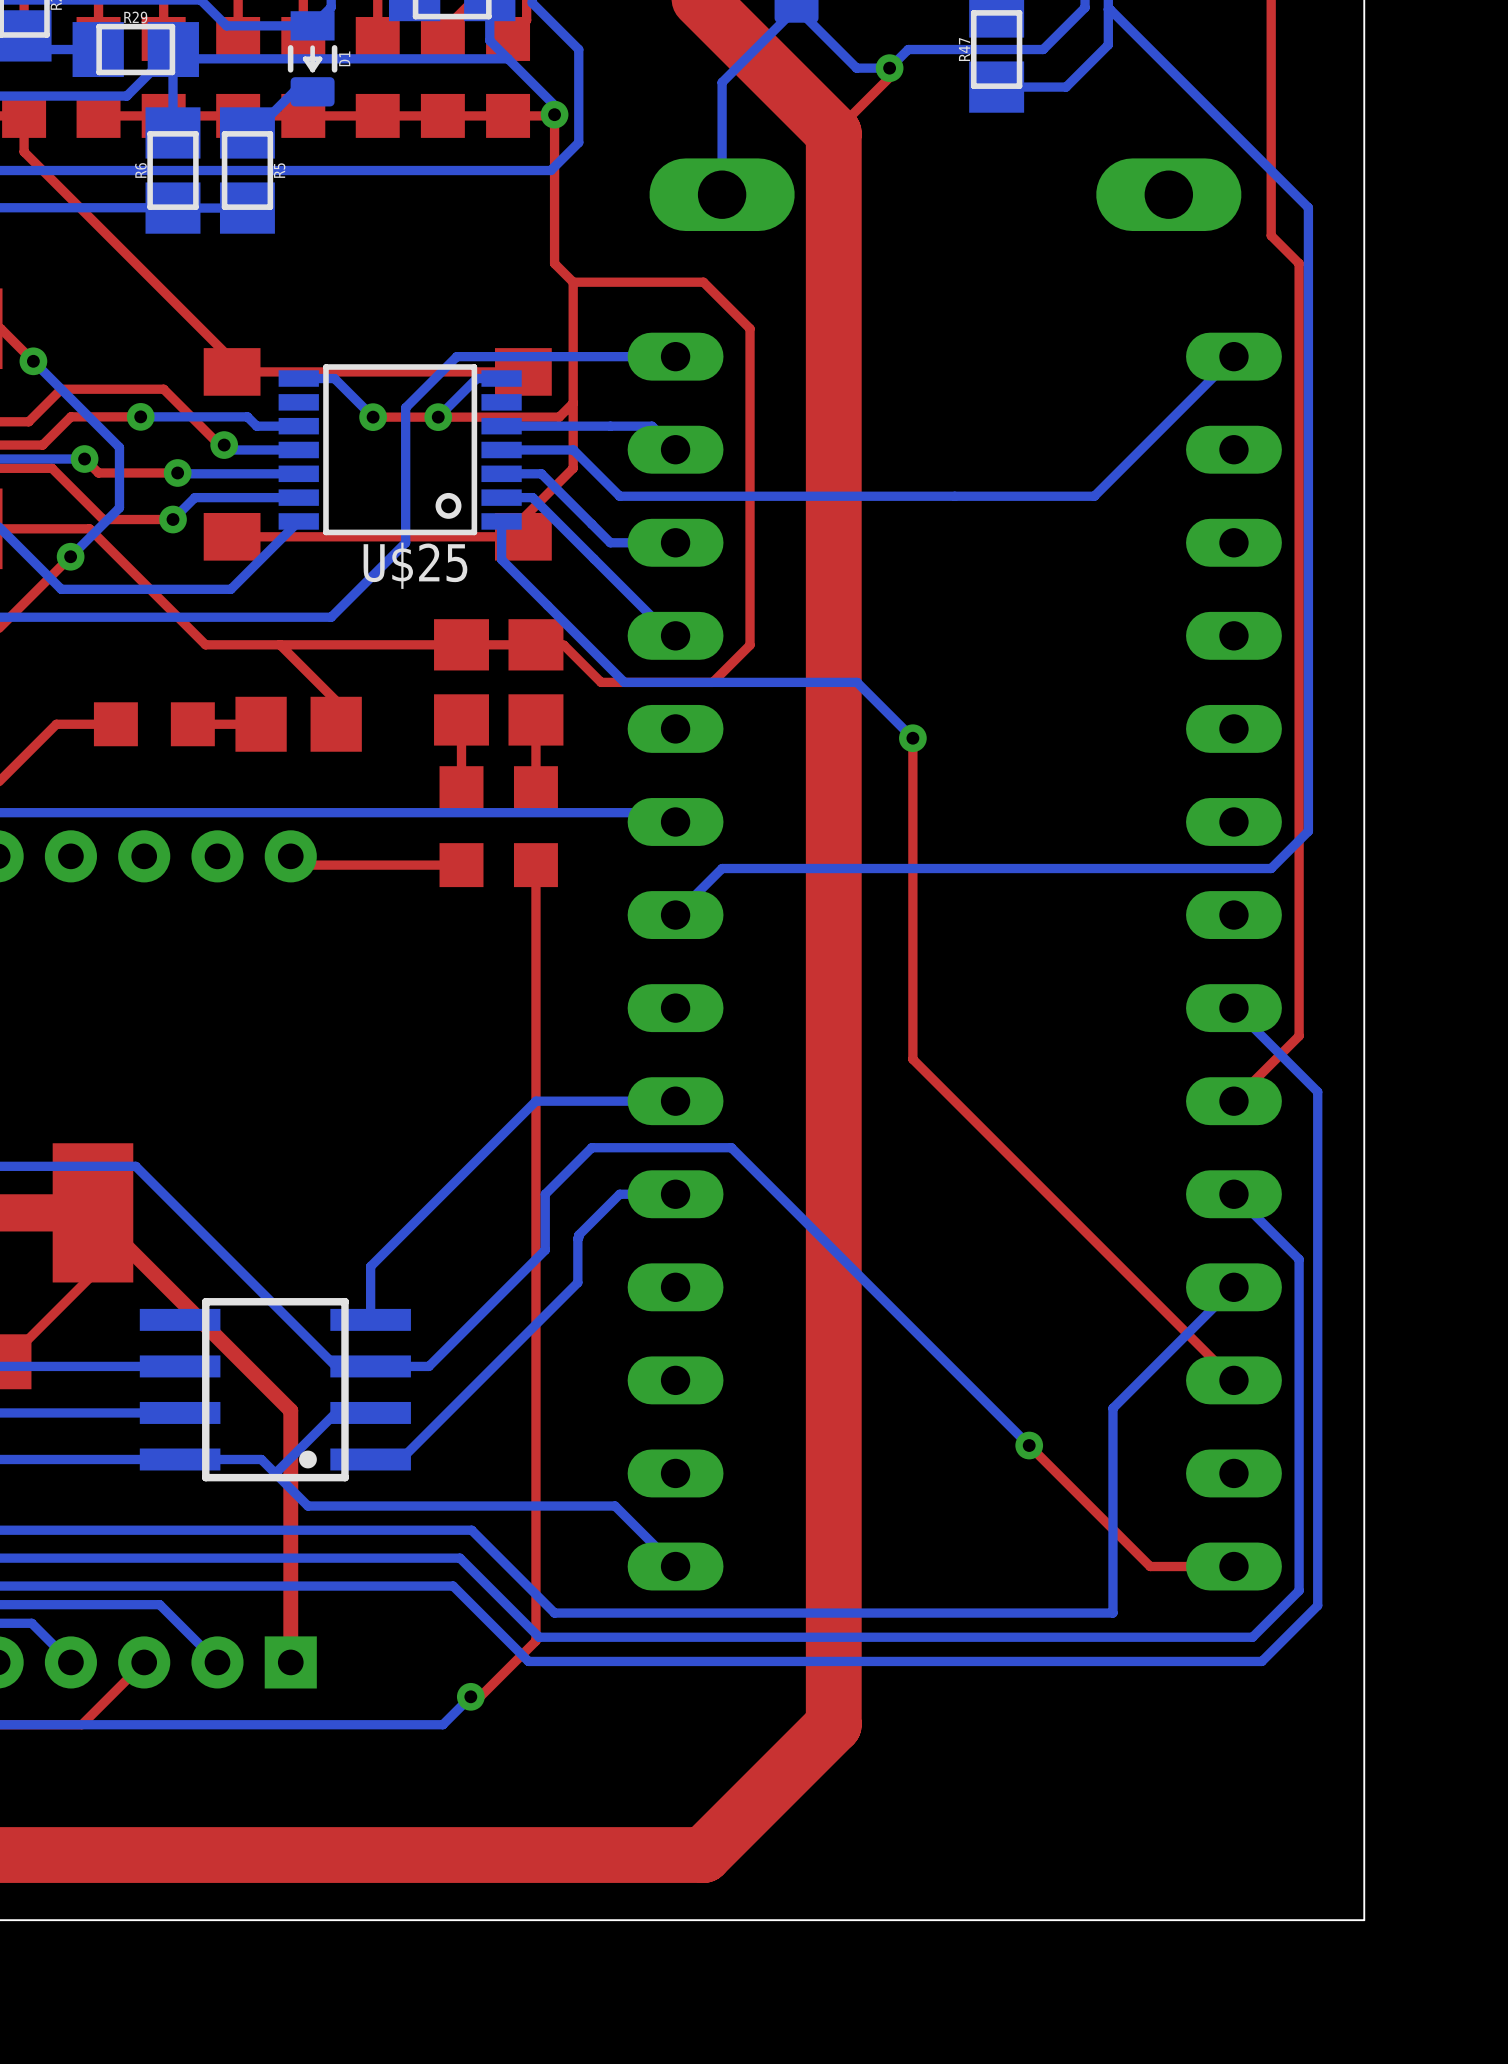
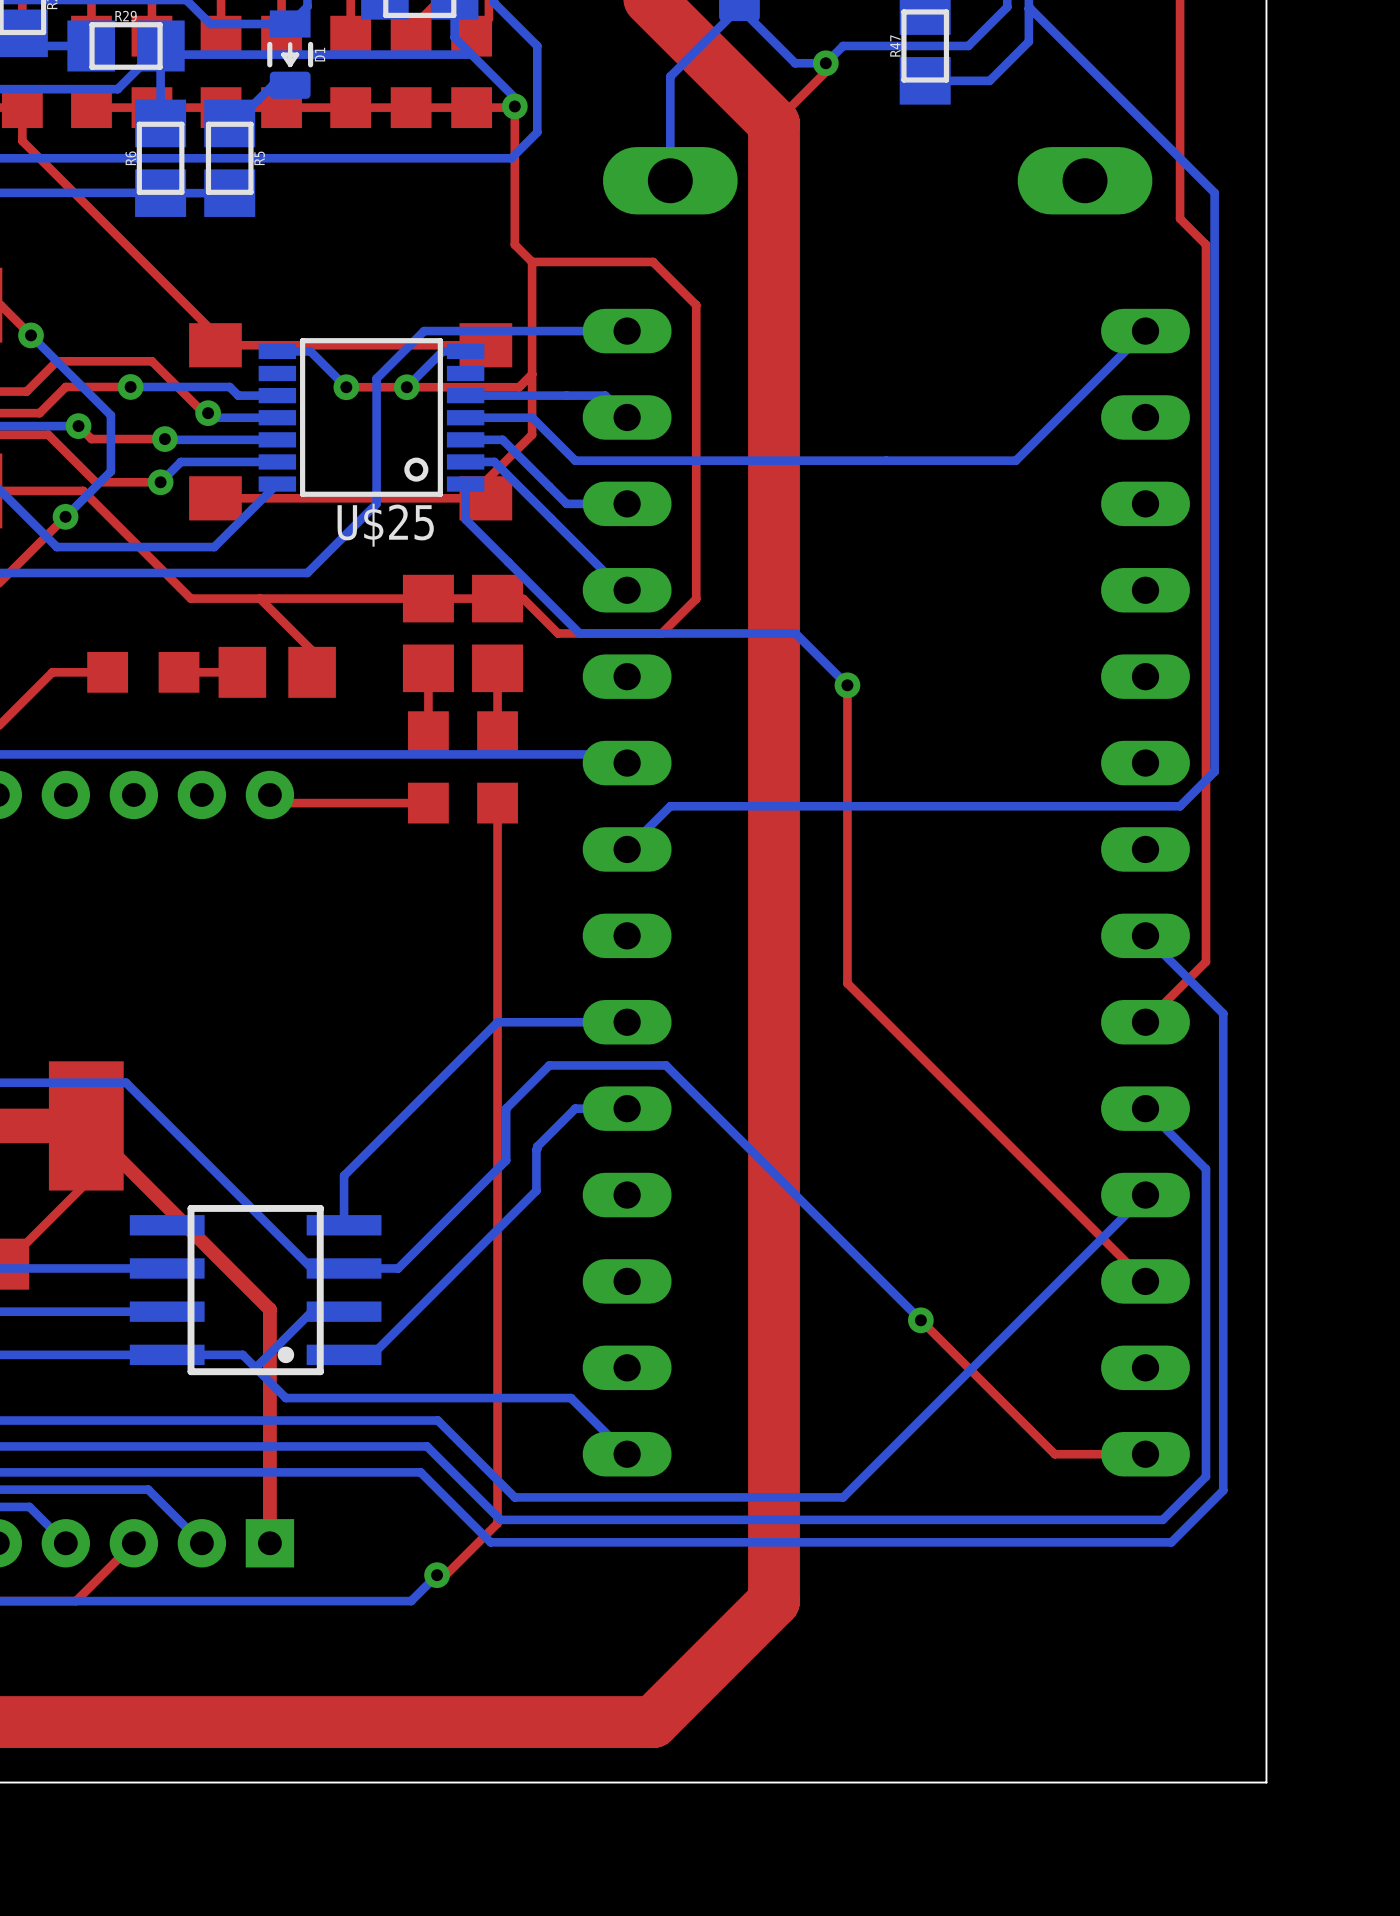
bottom track: (717, 1147) (731, 1147) (1029, 1445) -> (666, 1065) (920, 1320)
bottom track: (1112, 1408) (1112, 1613) (908, 1613) -> (1033, 1307) (843, 1497)
top track: (1029, 1445) (1150, 1566) -> (920, 1320) (1054, 1454) (1067, 1454)
via position: (1029, 1445) -> (920, 1320)

